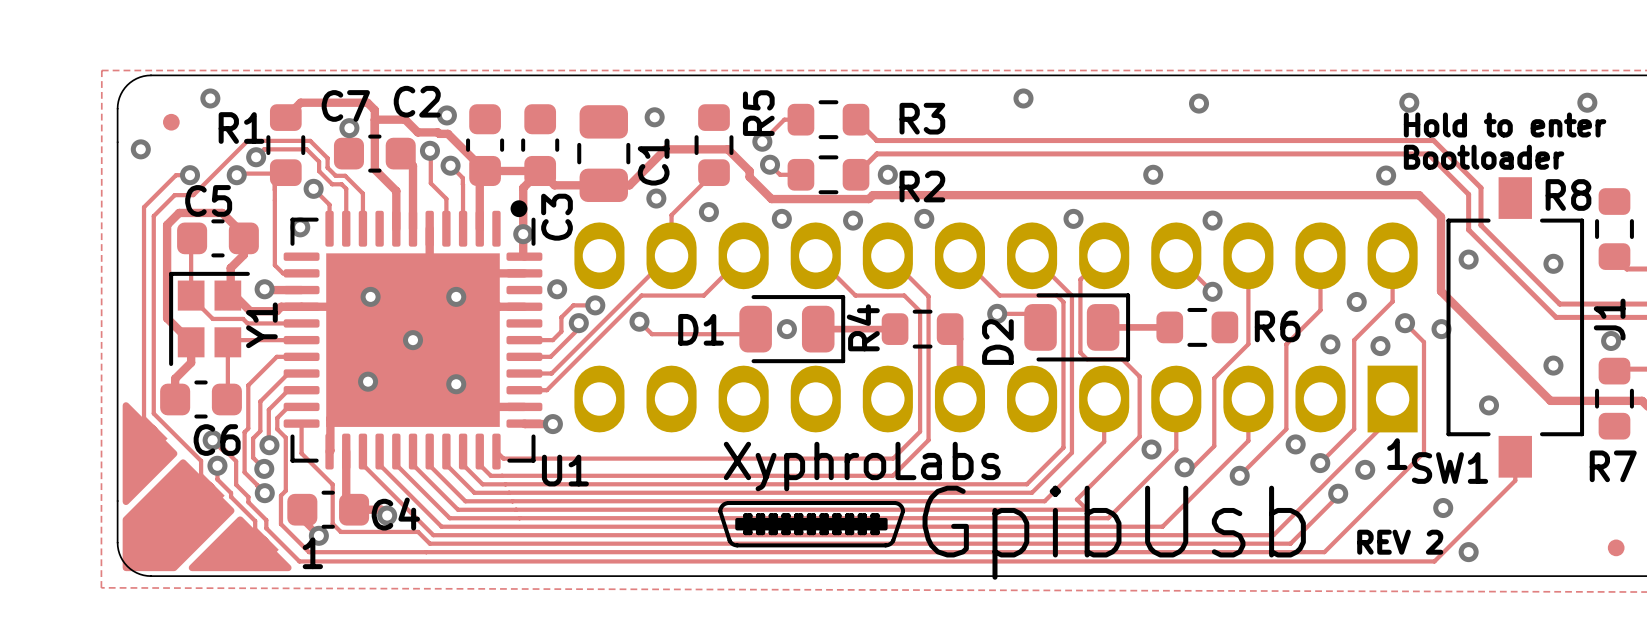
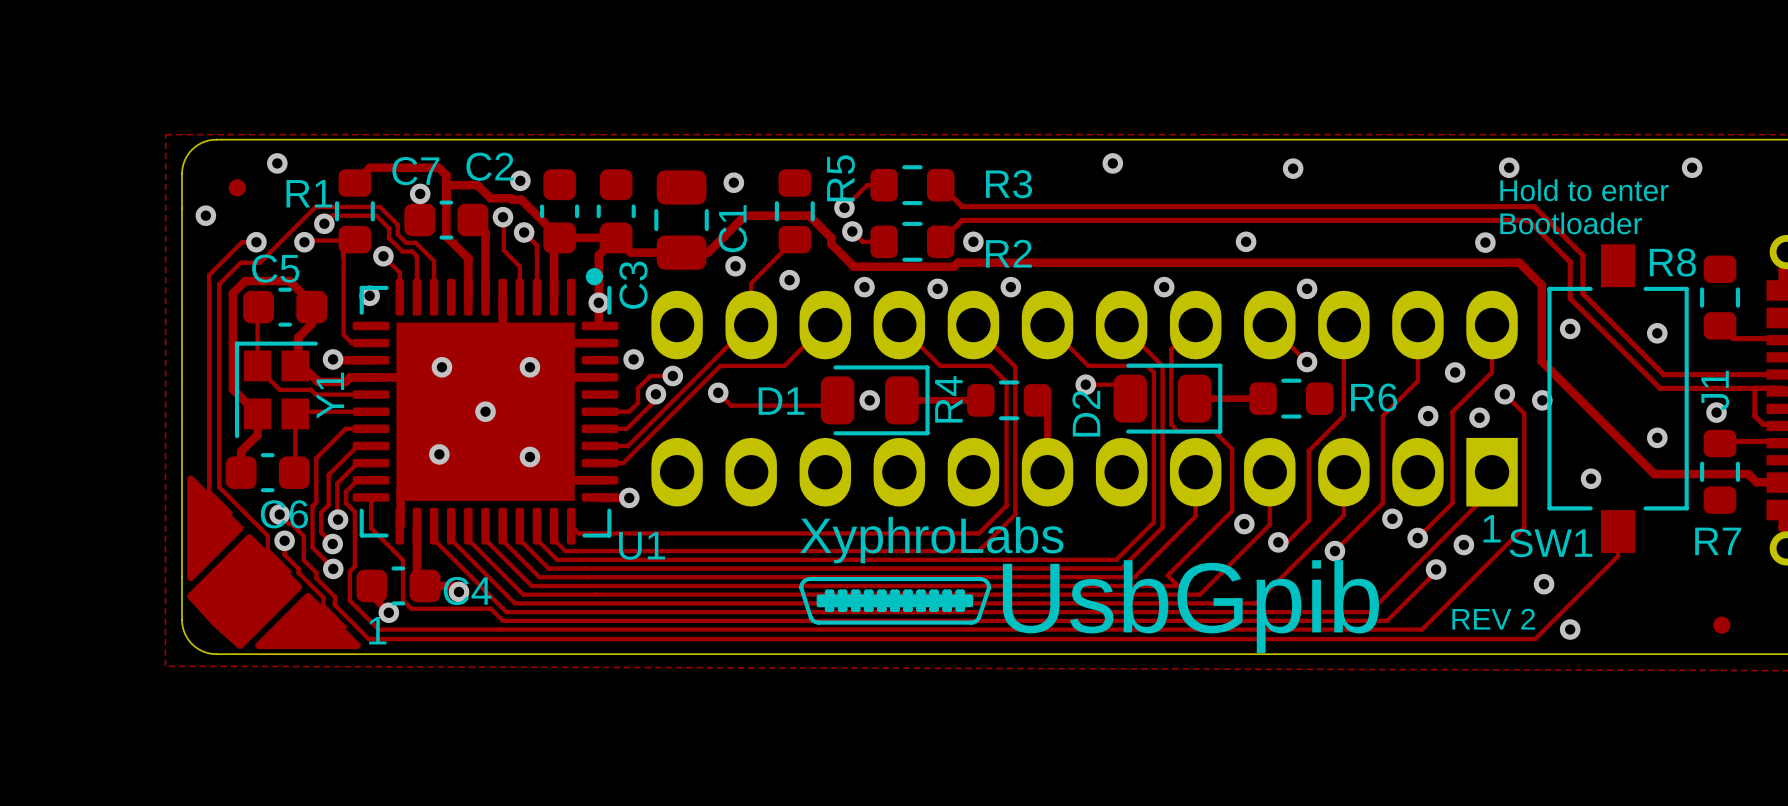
part footprint: [122, 402, 292, 572] -> [187, 475, 361, 650]
text: GpibUsb (1114, 532) -> UsbGpib (1190, 606)

